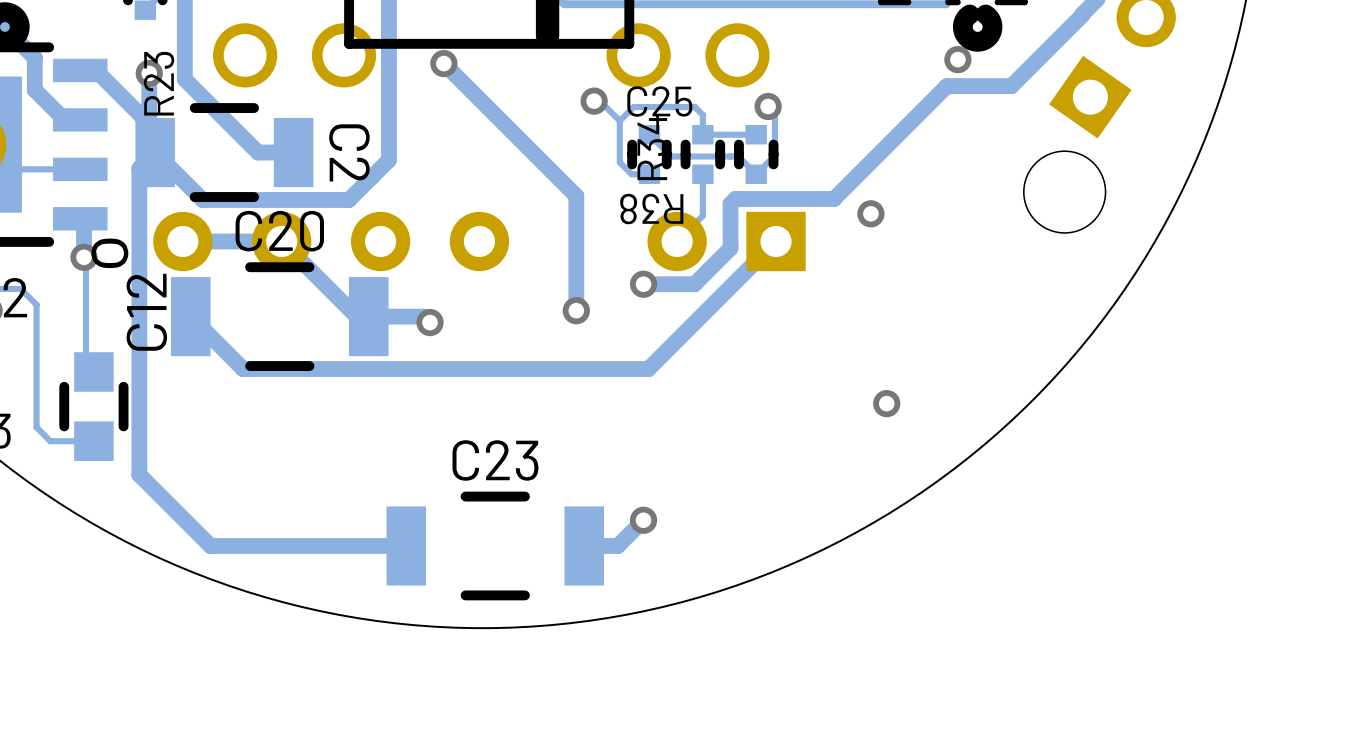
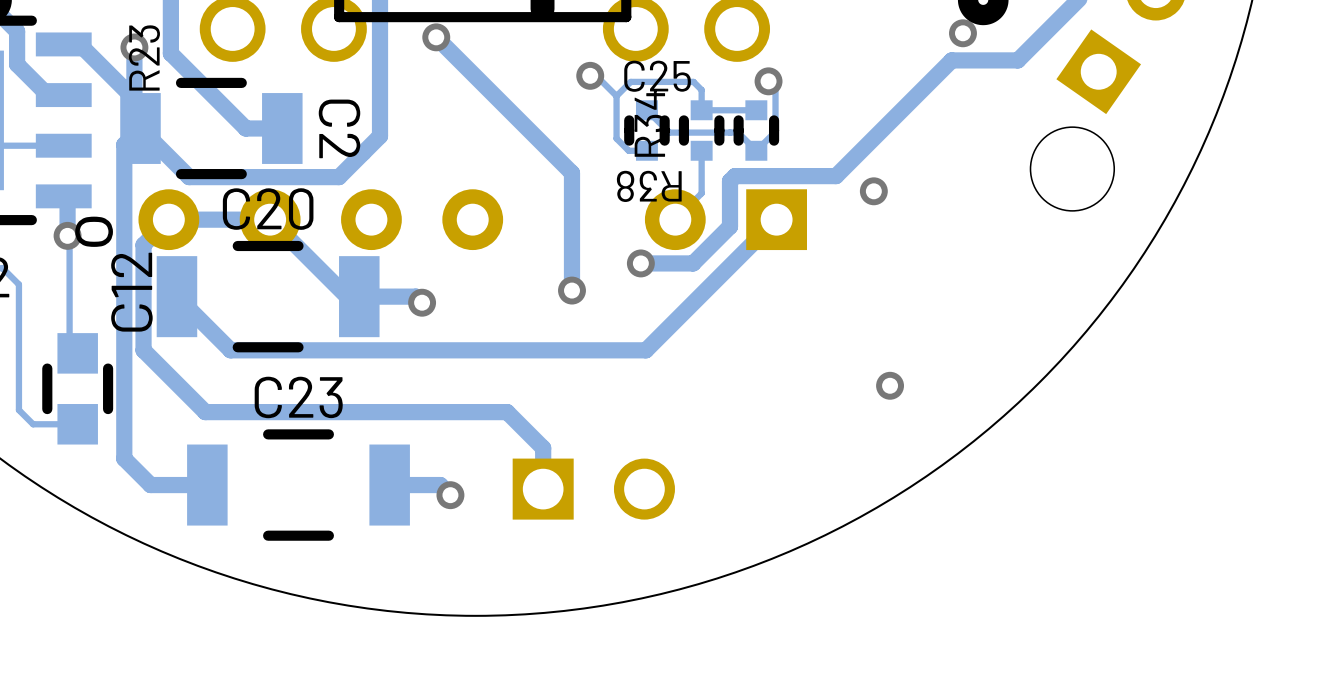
track: none -> (168, 219) (143, 244) (143, 350) (205, 412) (507, 412) (543, 448) (543, 489)
track: (165, 500) (210, 545) (406, 545) -> (150, 485) (207, 485)
track: none -> (389, 485) (440, 485) (450, 495)
part: none -> (593, 489)
track: (643, 520) (617, 545) (584, 545) -> none
via position: (643, 520) -> (450, 495)
C23 position: (495, 545) -> (298, 485)

